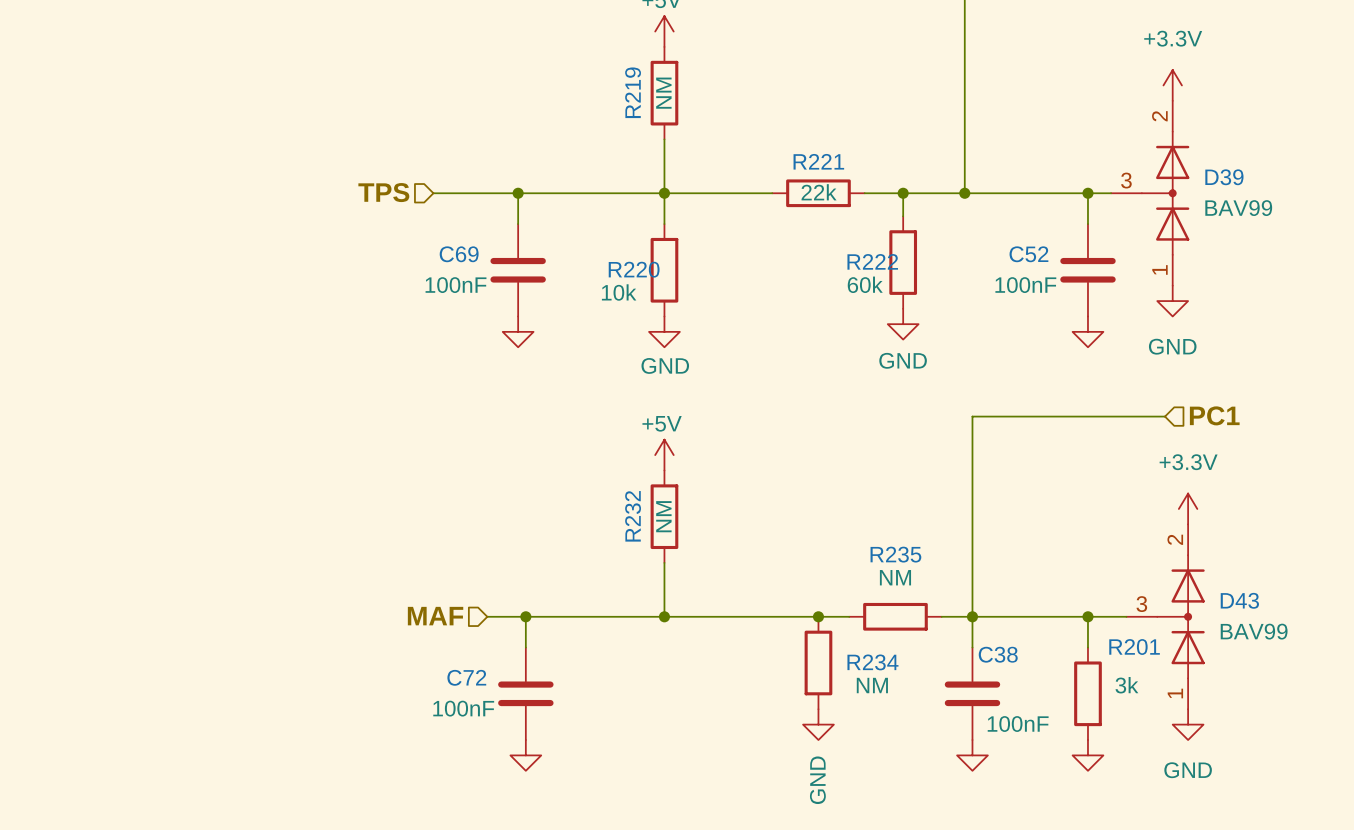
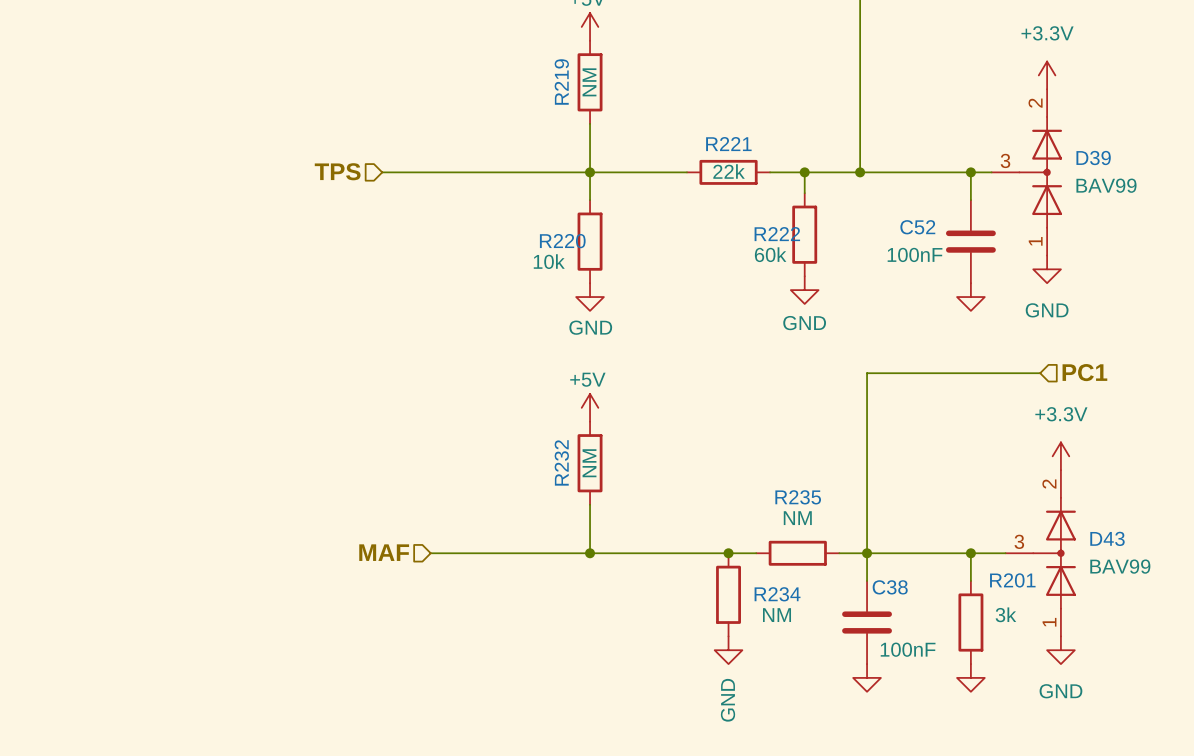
wire: (518, 193) (518, 224) -> none
junction: (518, 193) -> none
C69: 100nF (518, 270) -> none
power symbol: (518, 331) -> none
wire: (525, 616) (525, 647) -> none
junction: (525, 616) -> none
C72: 100nF (525, 693) -> none
power symbol: (525, 755) -> none

